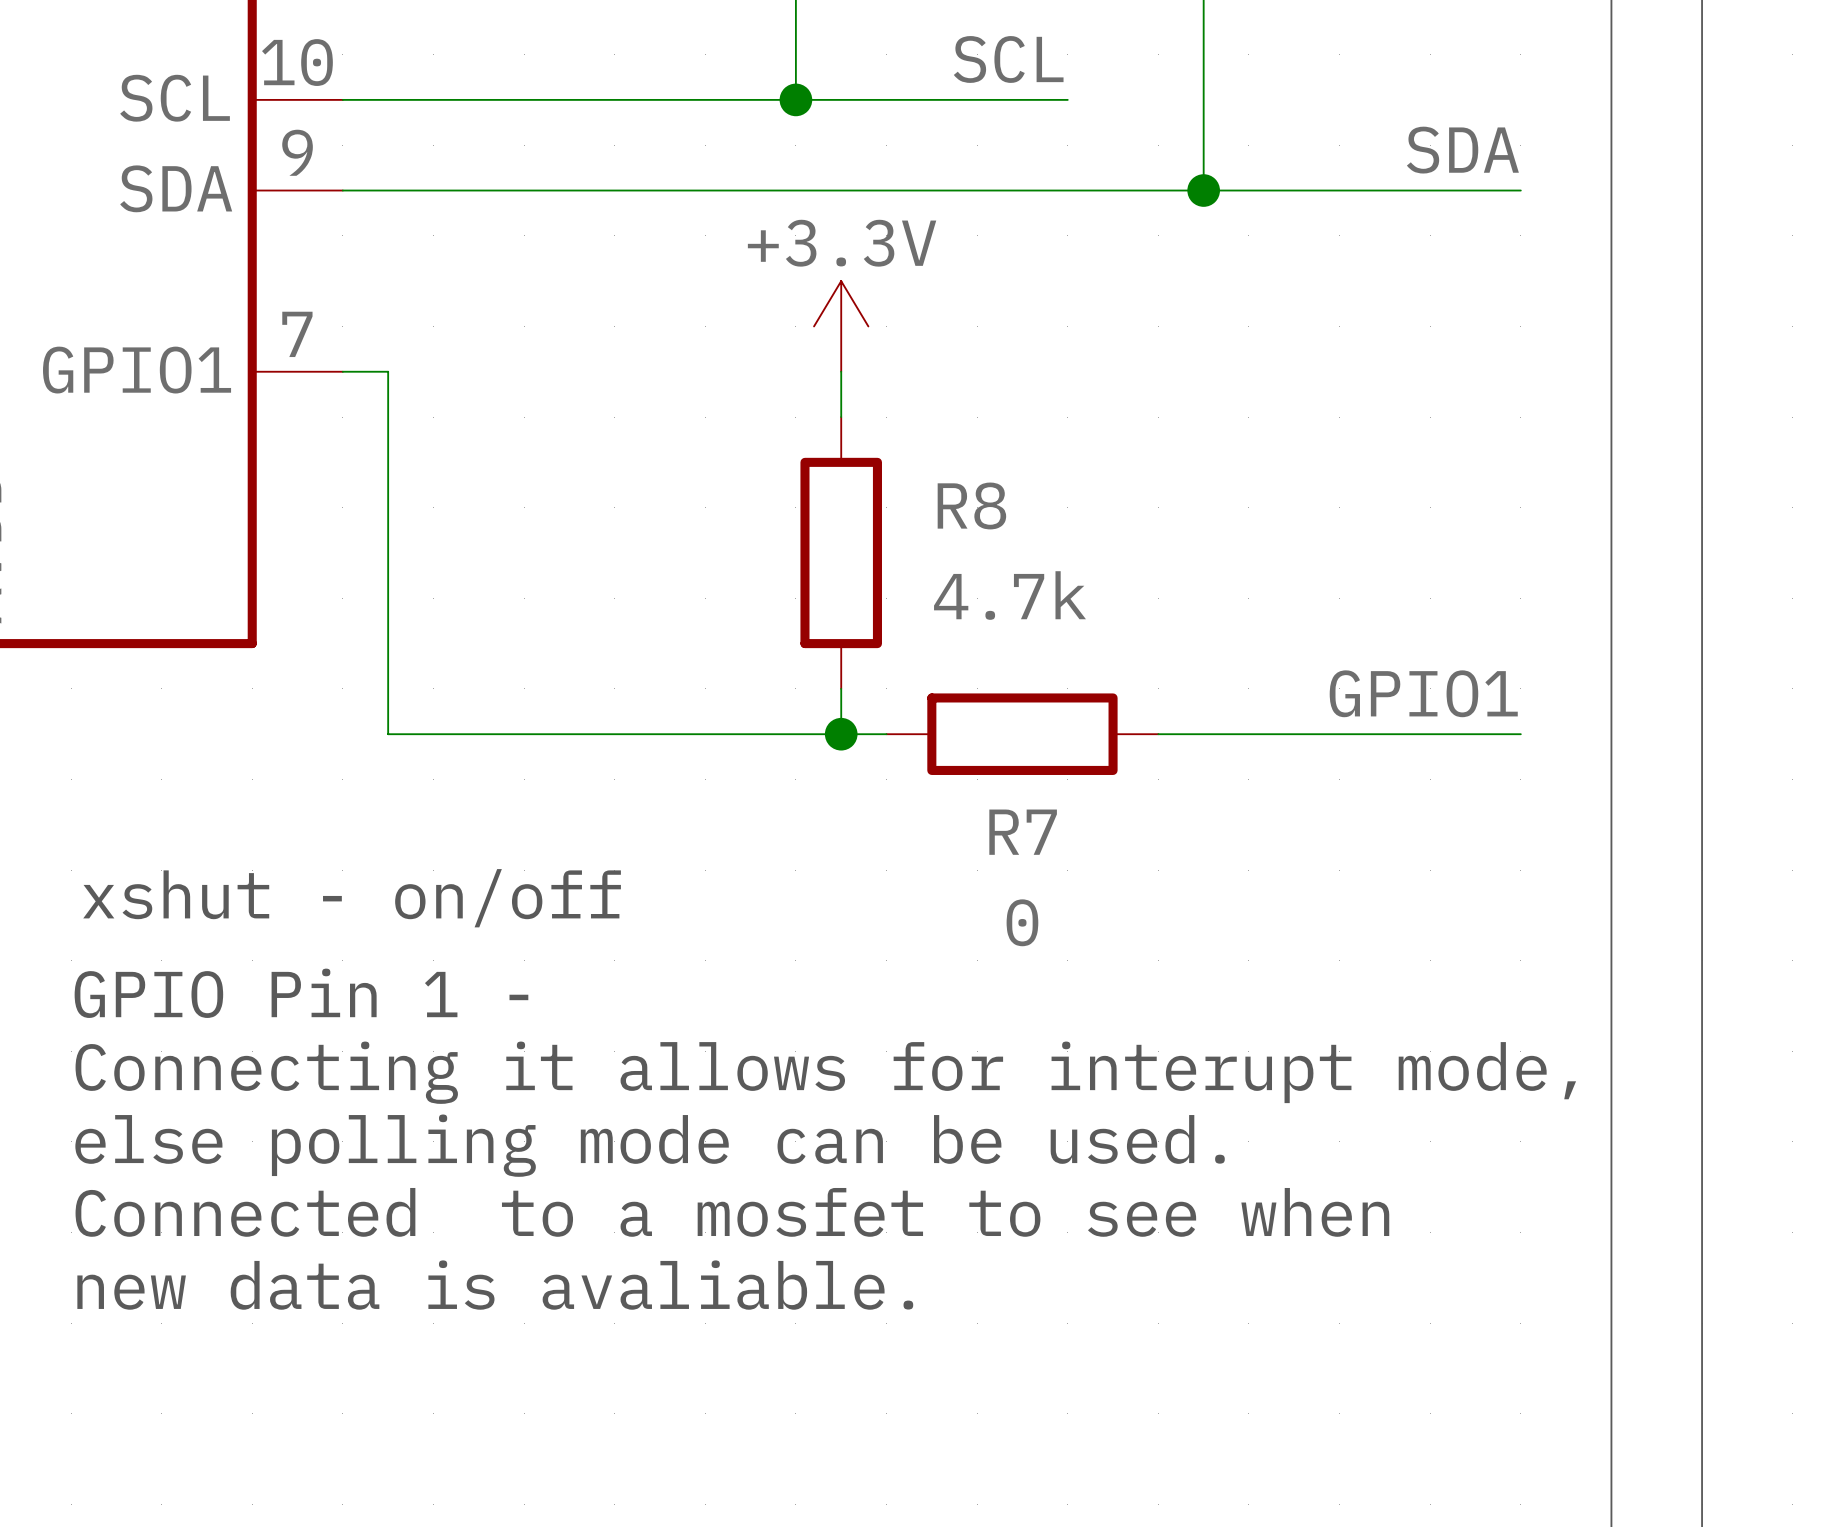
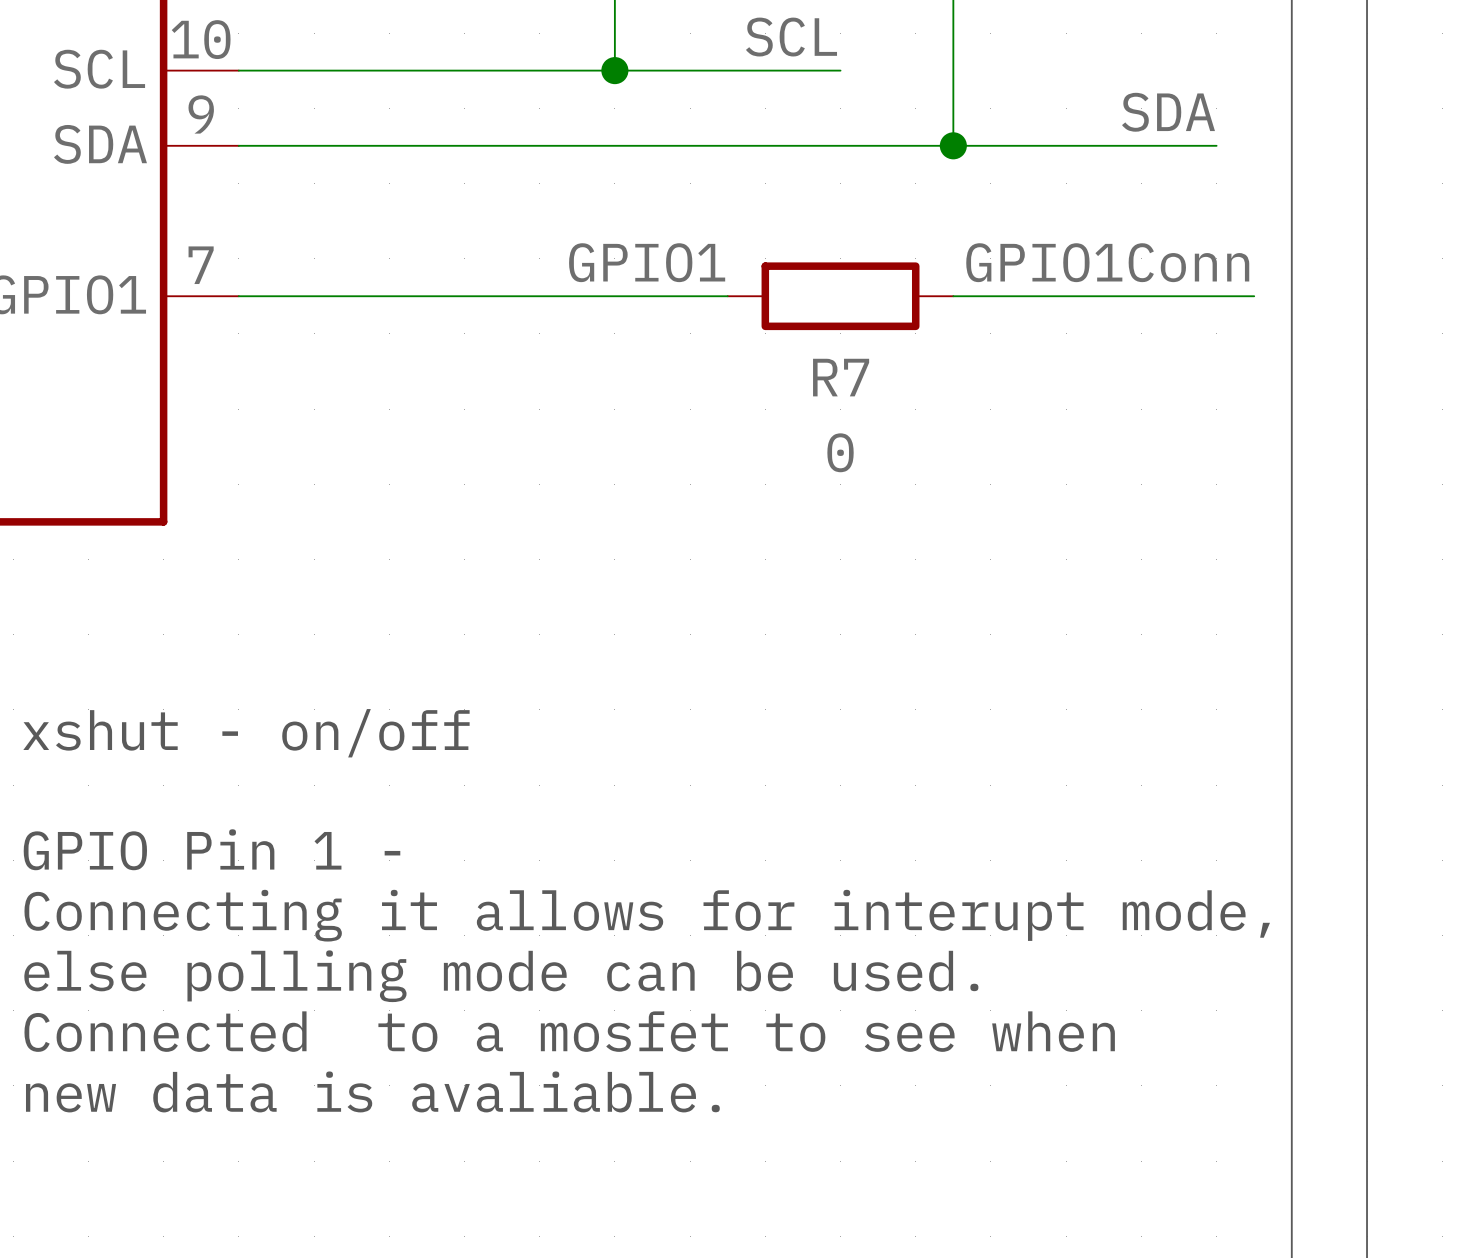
power symbol: +3.3V (841, 326) -> none
label: none -> GPIO1Conn (1107, 262)
wire: (388, 371) (388, 734) (886, 734) -> (276, 296) (727, 296)
wire: (841, 371) (841, 417) -> none
R8: 4.7k (841, 552) -> none
wire: (841, 688) (841, 734) -> none
label position: GPIO1 (1423, 693) -> GPIO1 (647, 262)
junction: (841, 734) -> none
R7 position: (1022, 734) -> (840, 296)
wire: (1158, 734) (1520, 734) -> (953, 296) (1254, 296)
text position: GPIO Pin 1 - (301, 993) -> GPIO Pin 1 - (212, 849)
text position: Connecting it allows for interupt mode, (825, 1072) -> Connecting it allows for interupt mode, (647, 915)
text position: else polling mode can be used. (650, 1145) -> else polling mode can be used. (501, 976)
text position: Connected to a mosfet to see when (732, 1212) -> Connected to a mosfet to see when (569, 1031)
text position: new data is avaliable. (495, 1285) -> new data is avaliable. (372, 1091)

